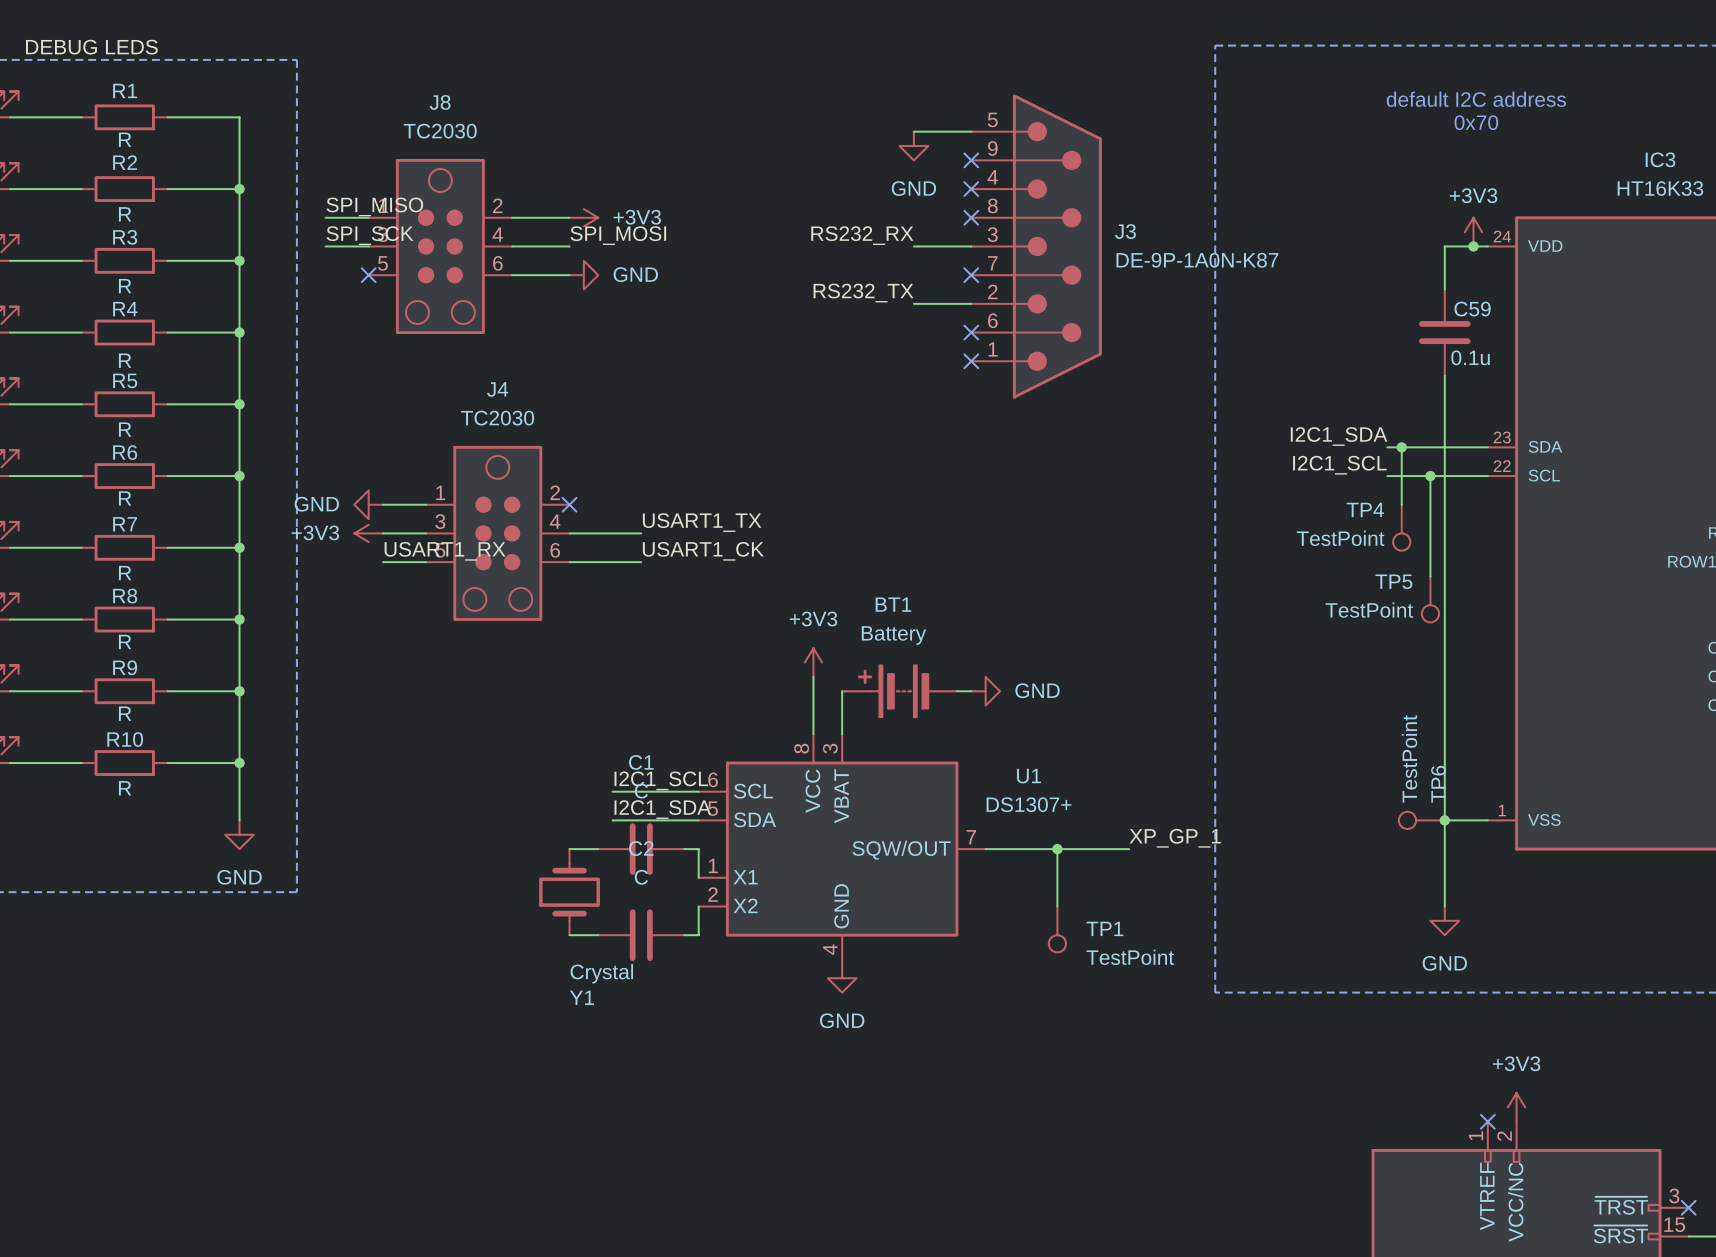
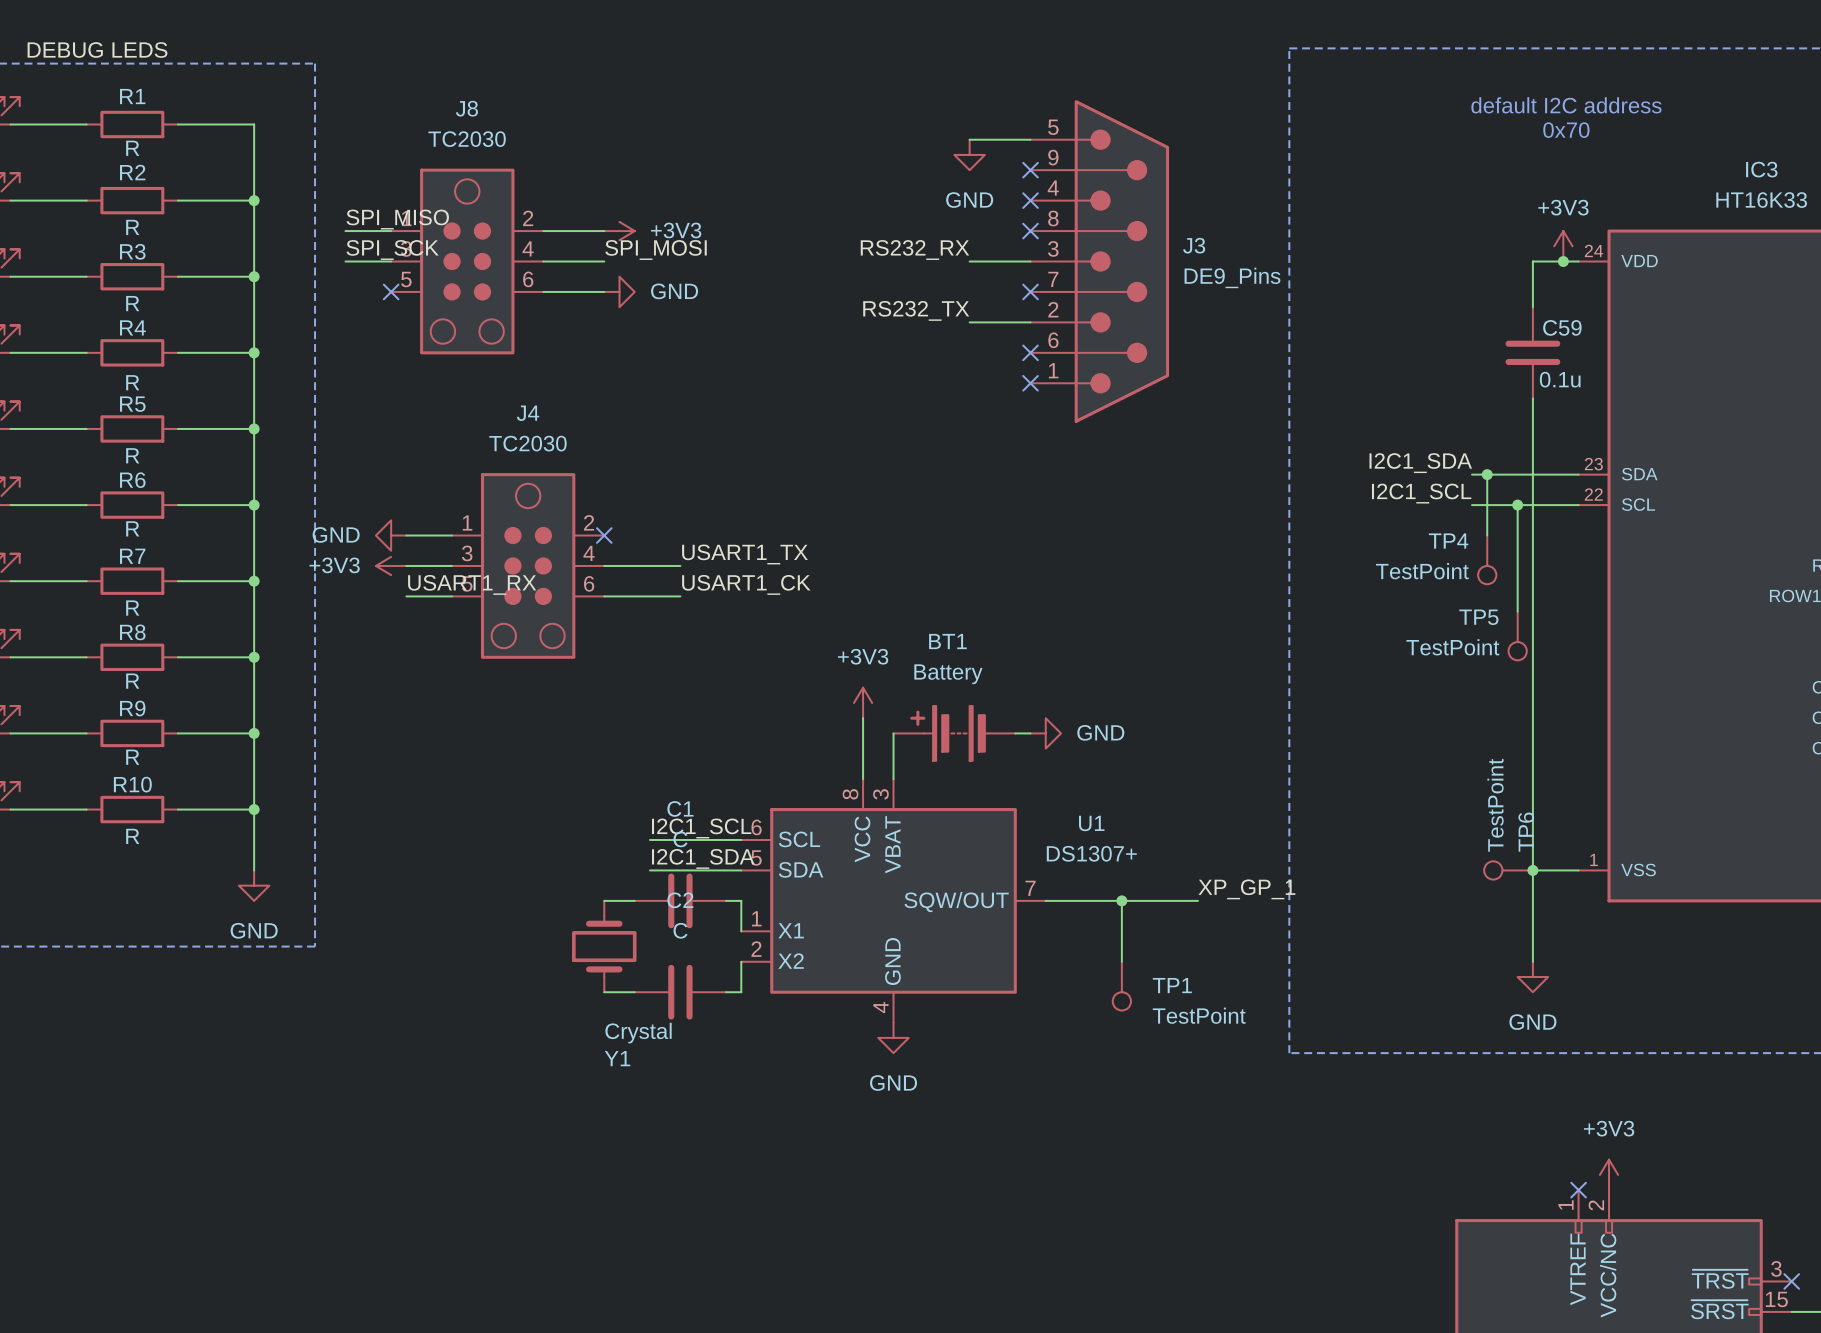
J3 value: DE-9P-1A0N-K87 (1197, 260) -> DE9_Pins (1232, 277)

